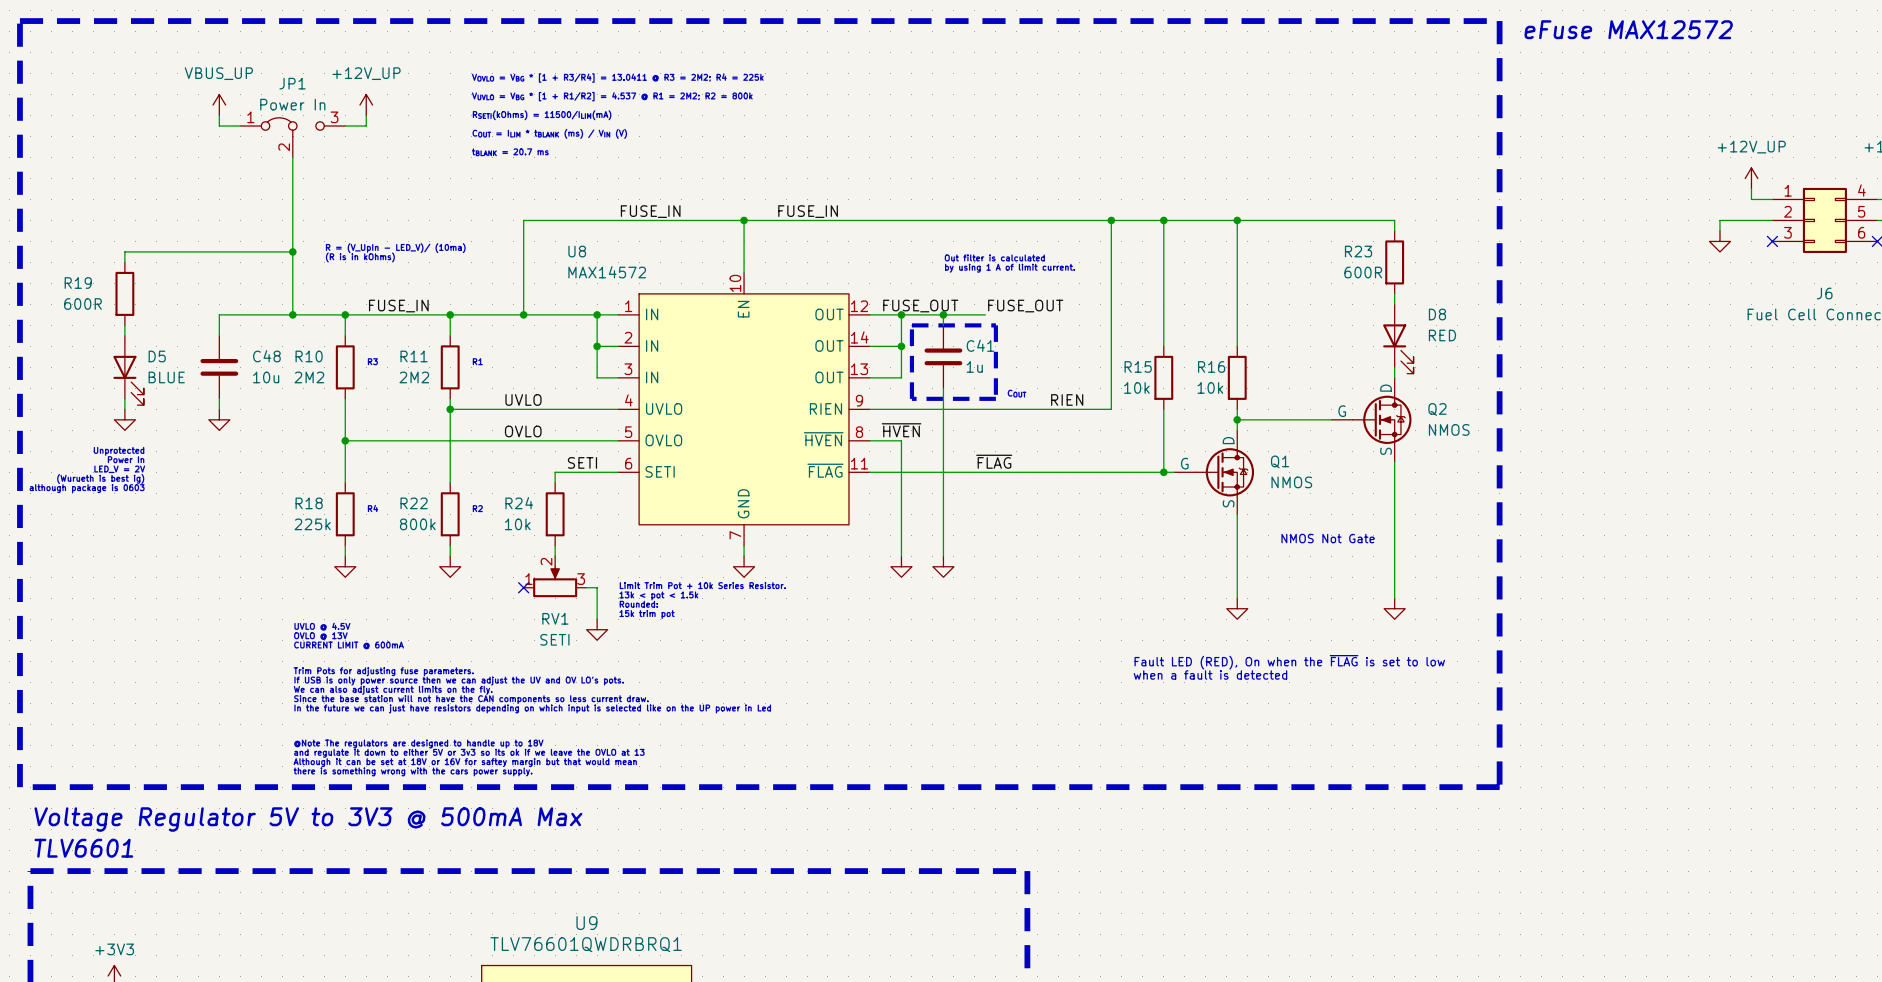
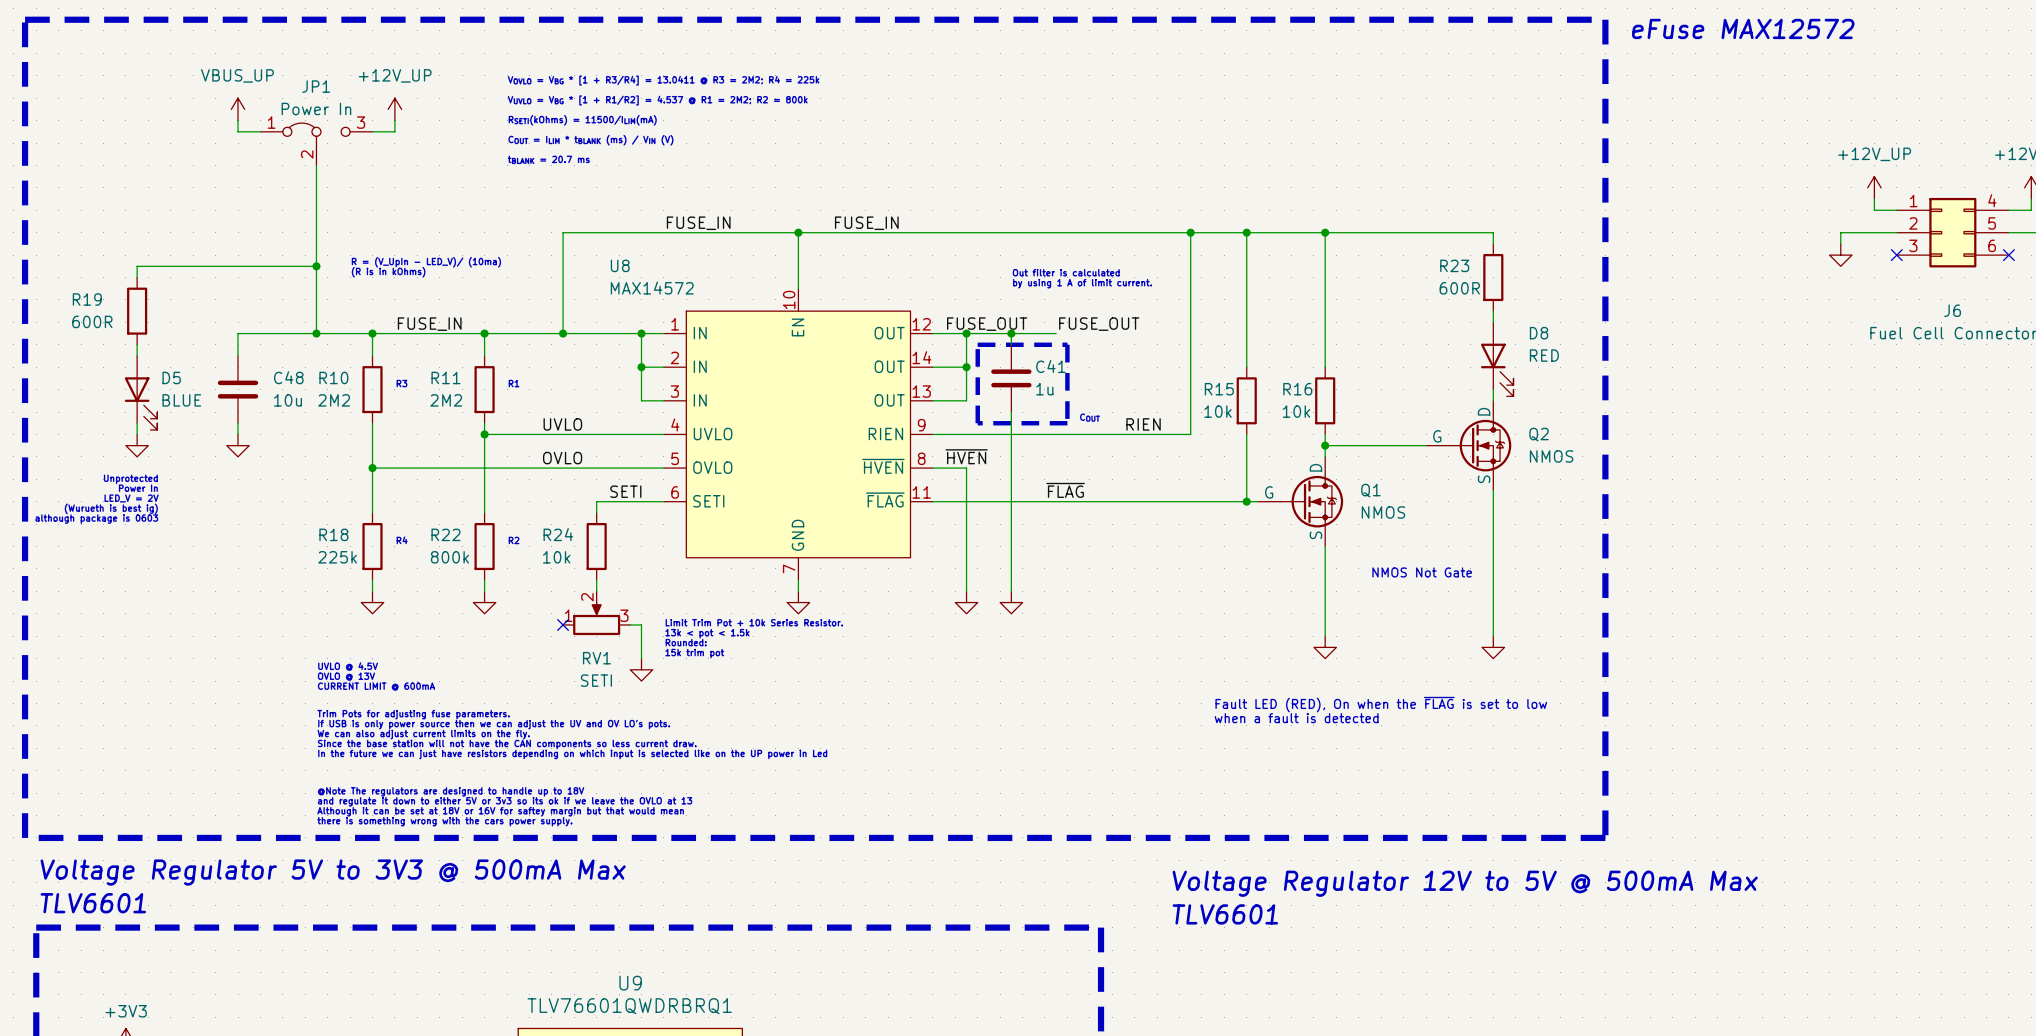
text: none -> Voltage Regulator 12V to 5V @ 500mA Max (1465, 883)
text: none -> TLV6601 (1225, 914)

